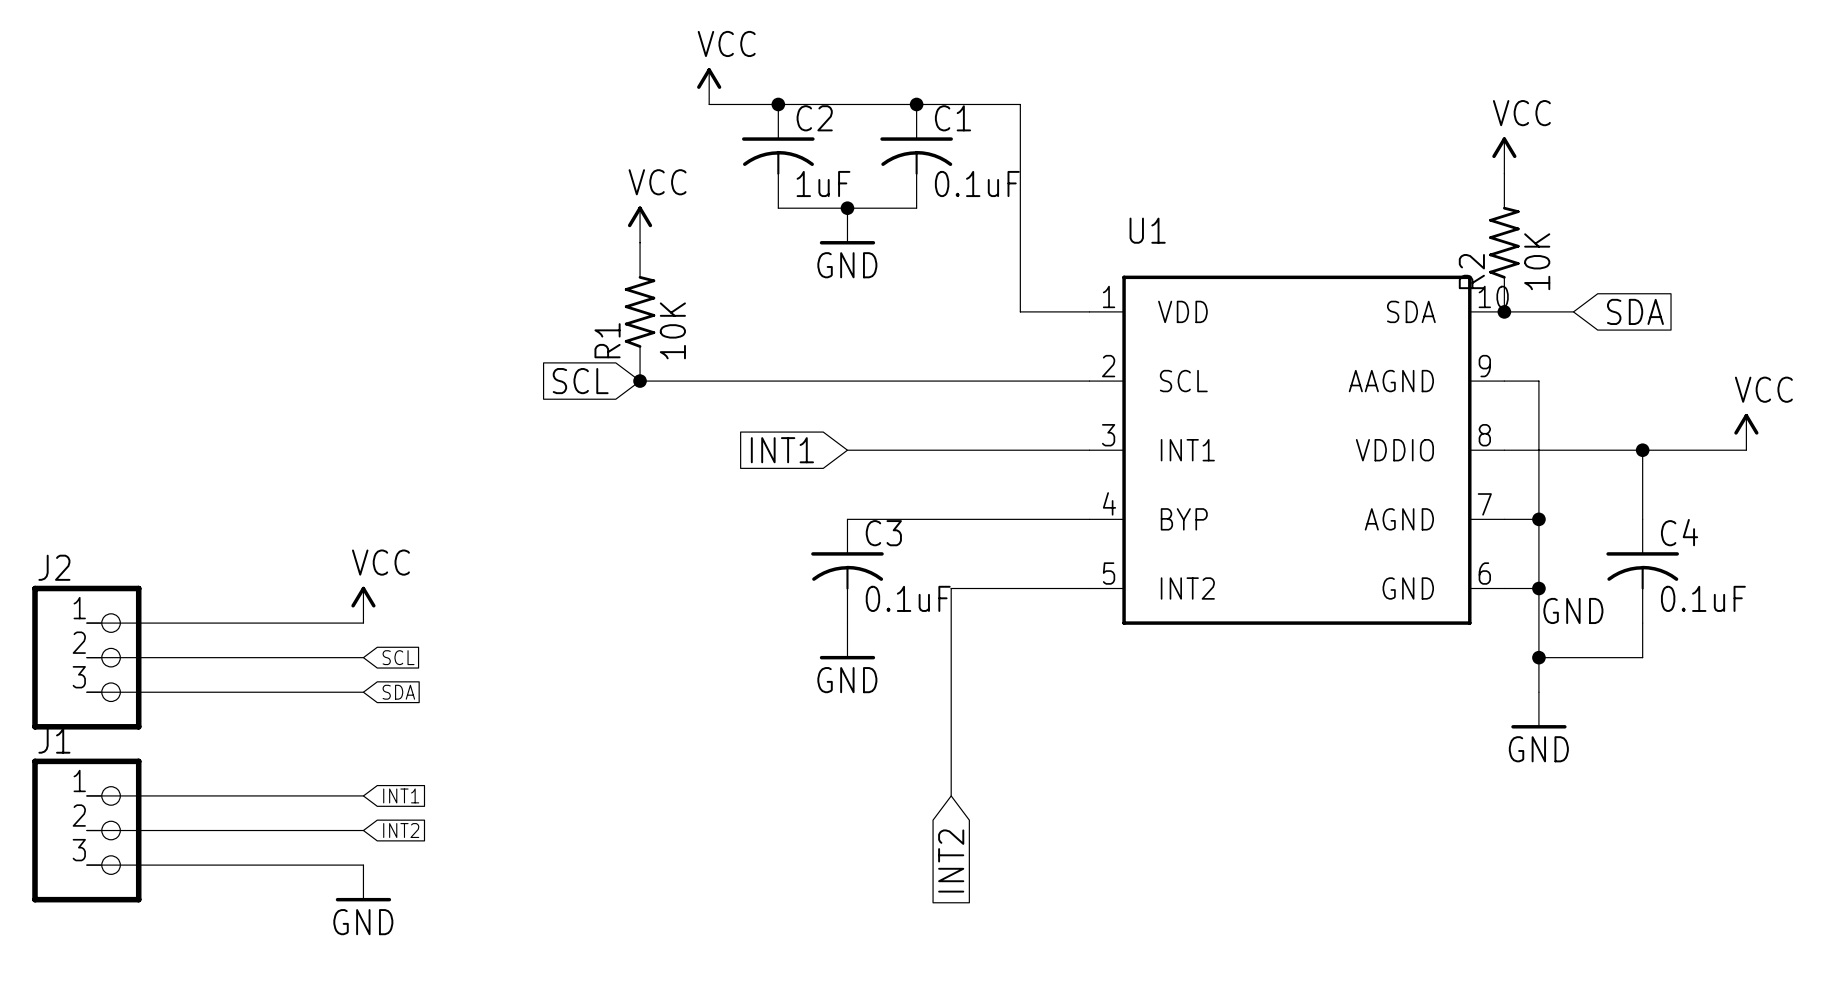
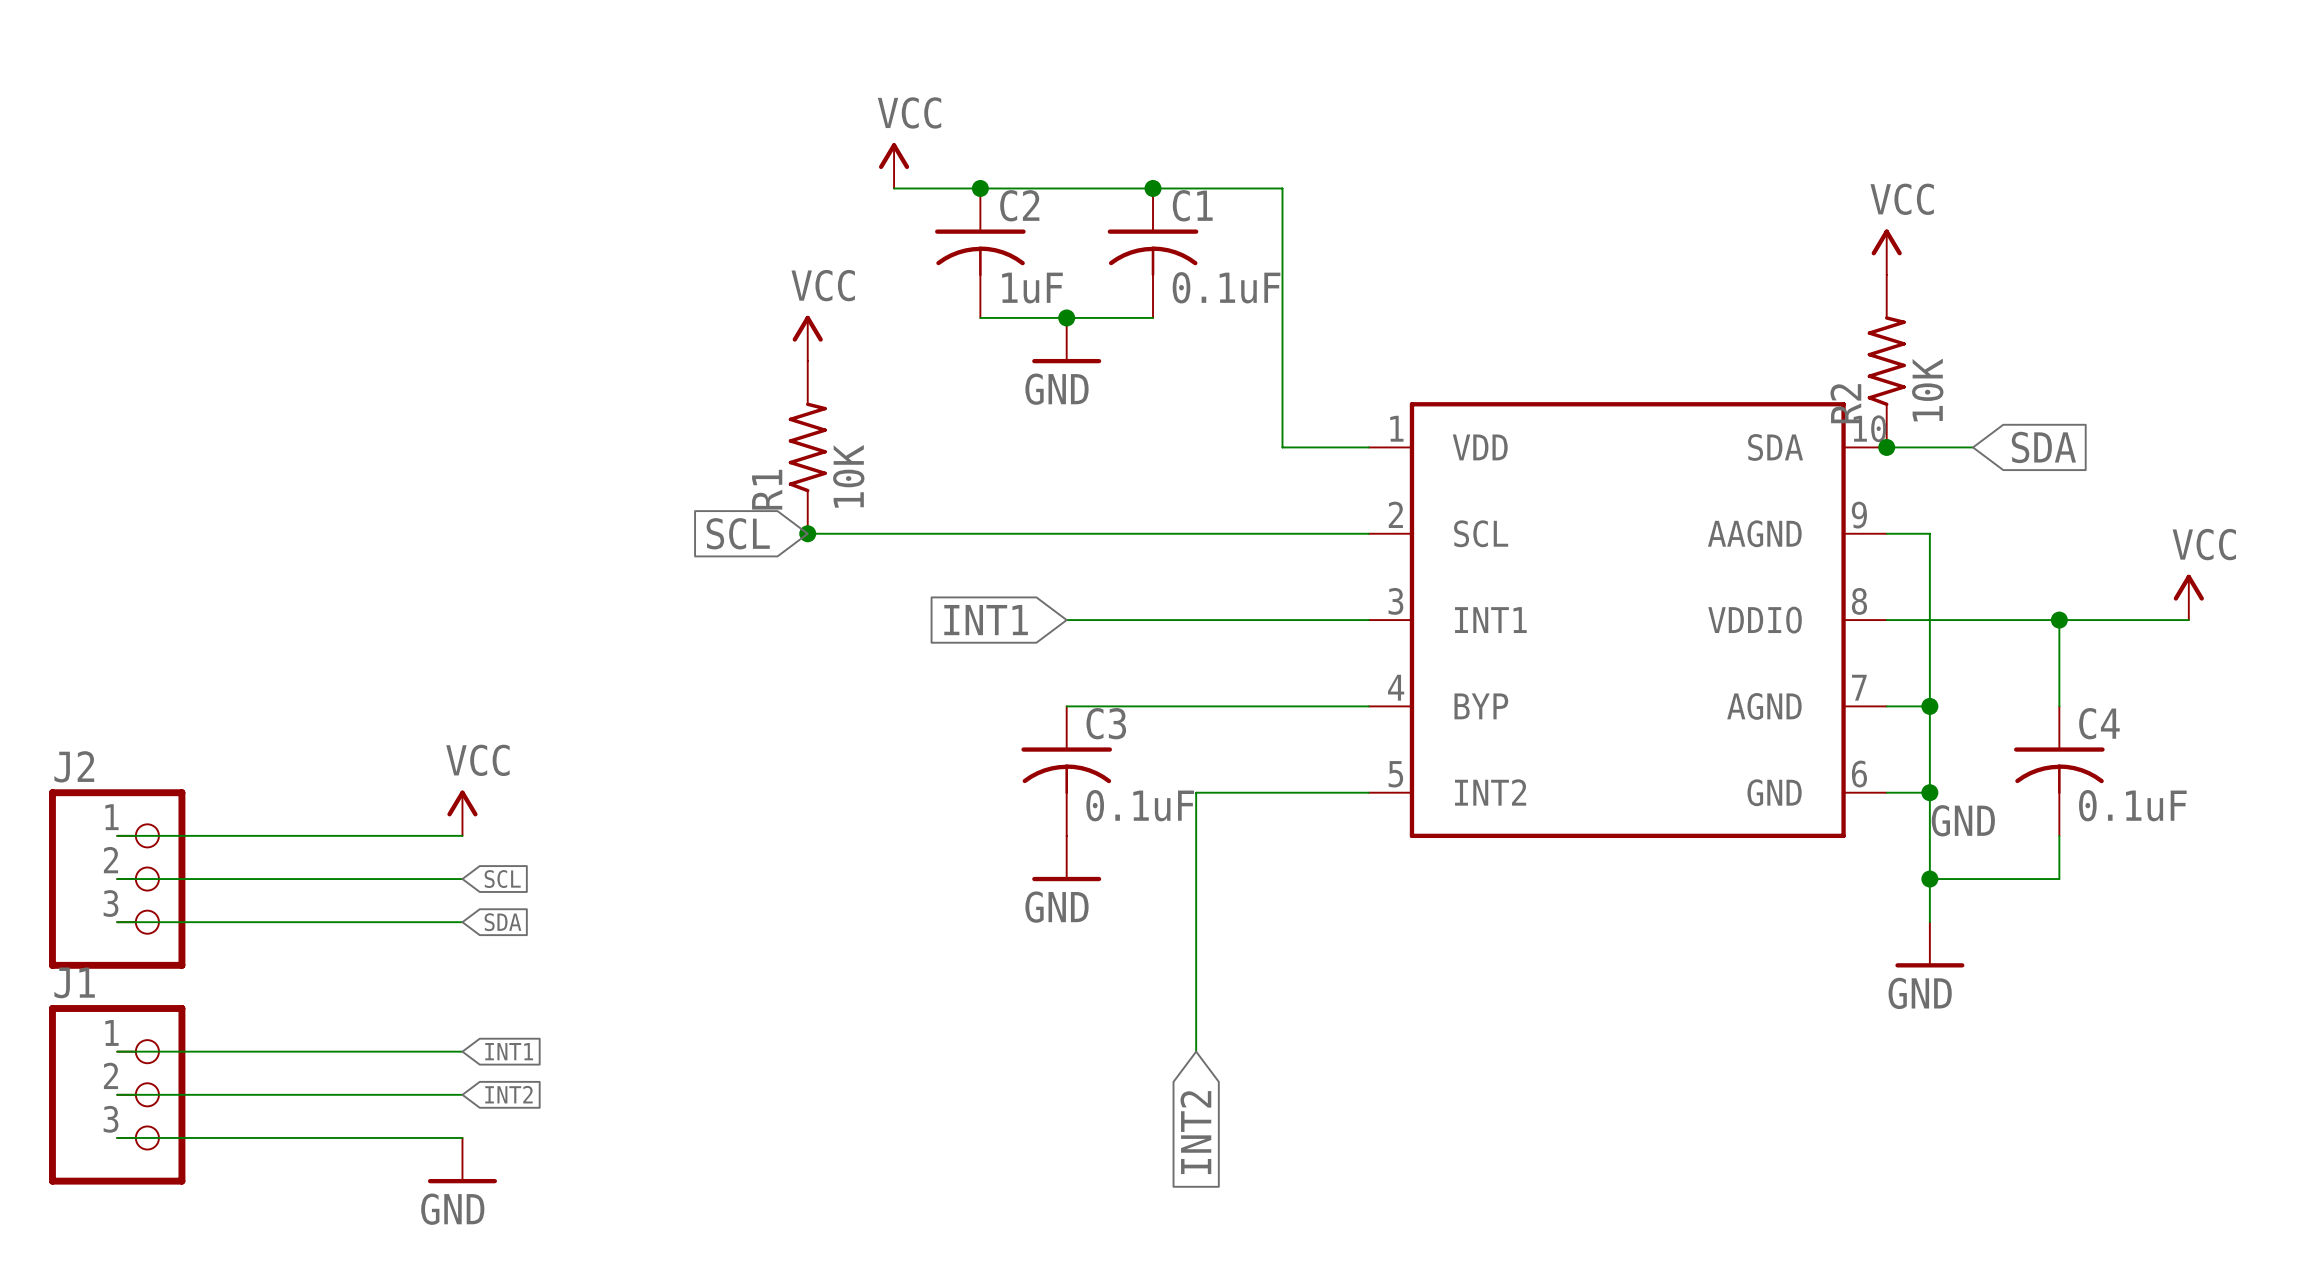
U1 name: U1 (1147, 230) -> none

